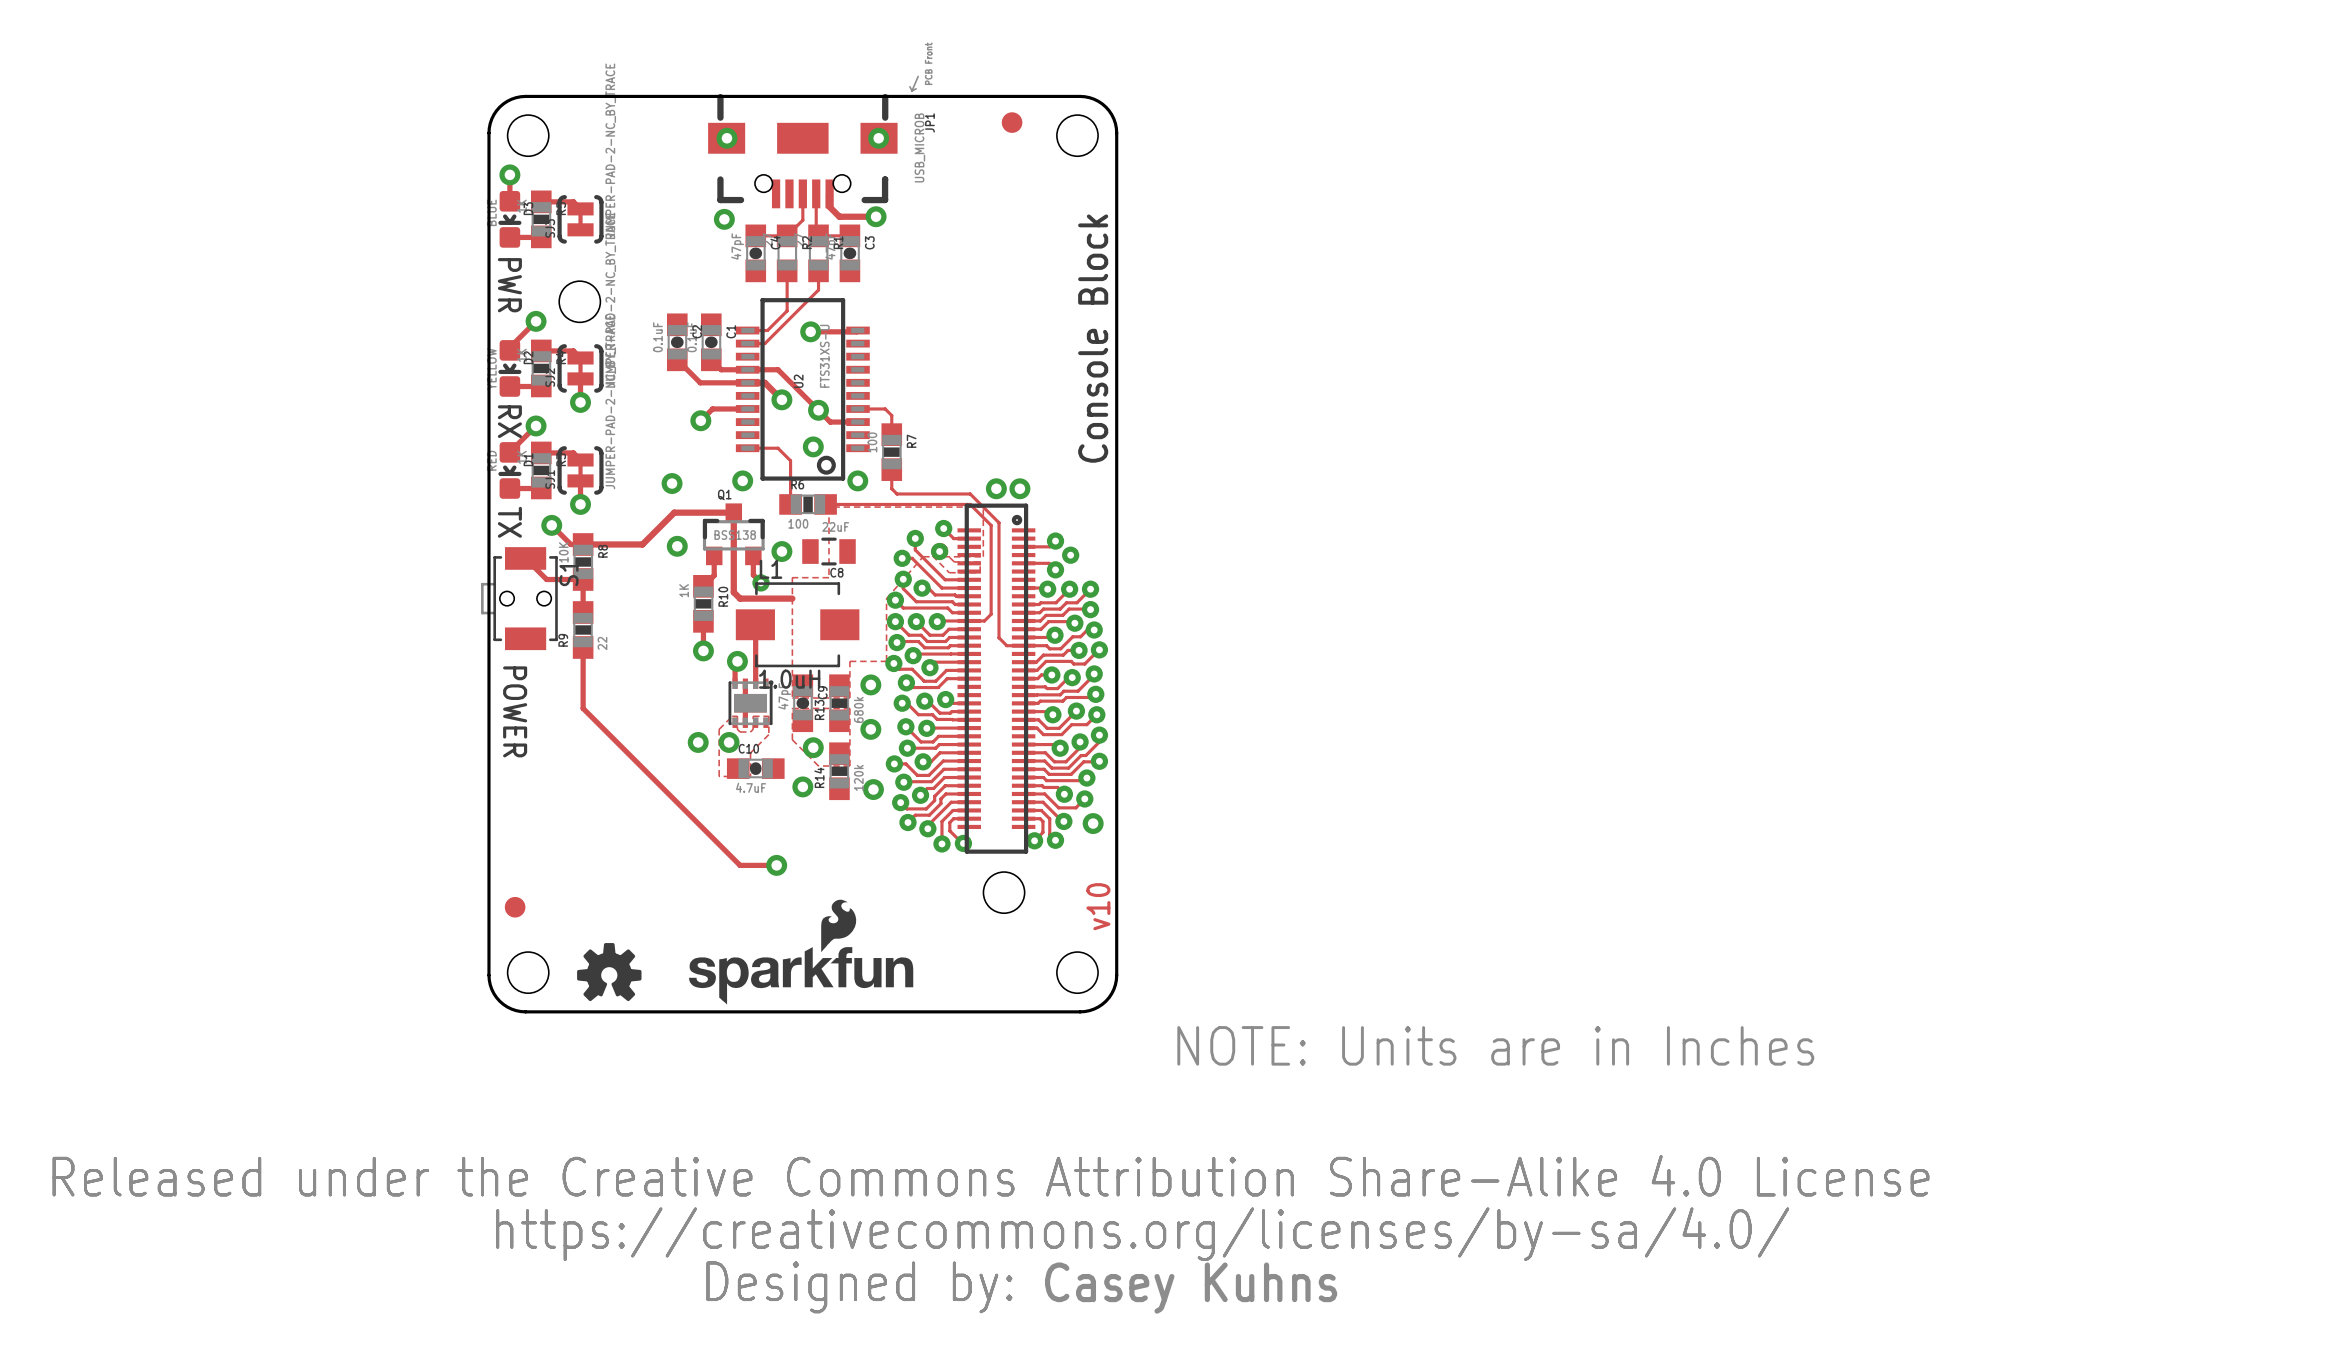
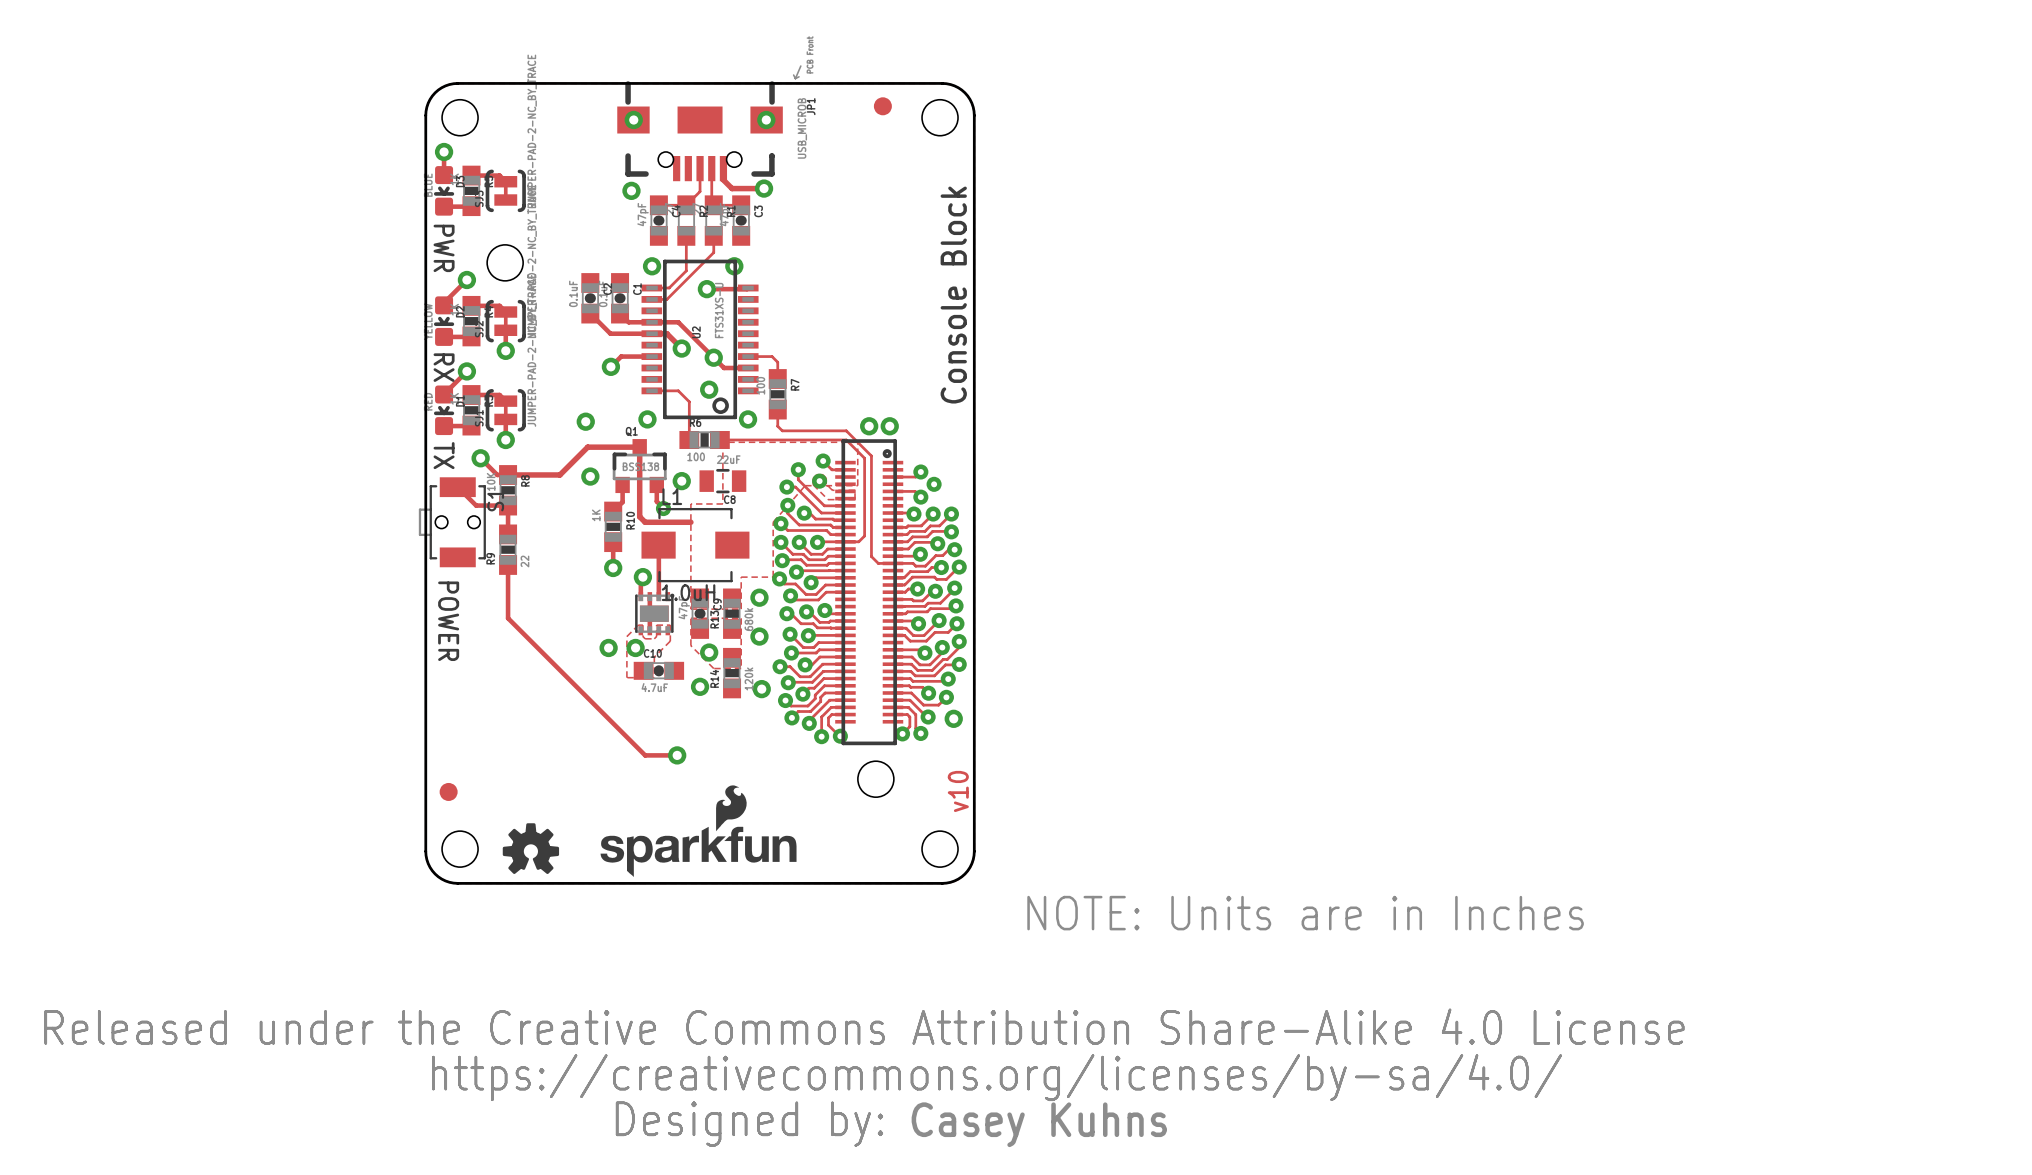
via: none -> (652, 266)
via: none -> (734, 266)

